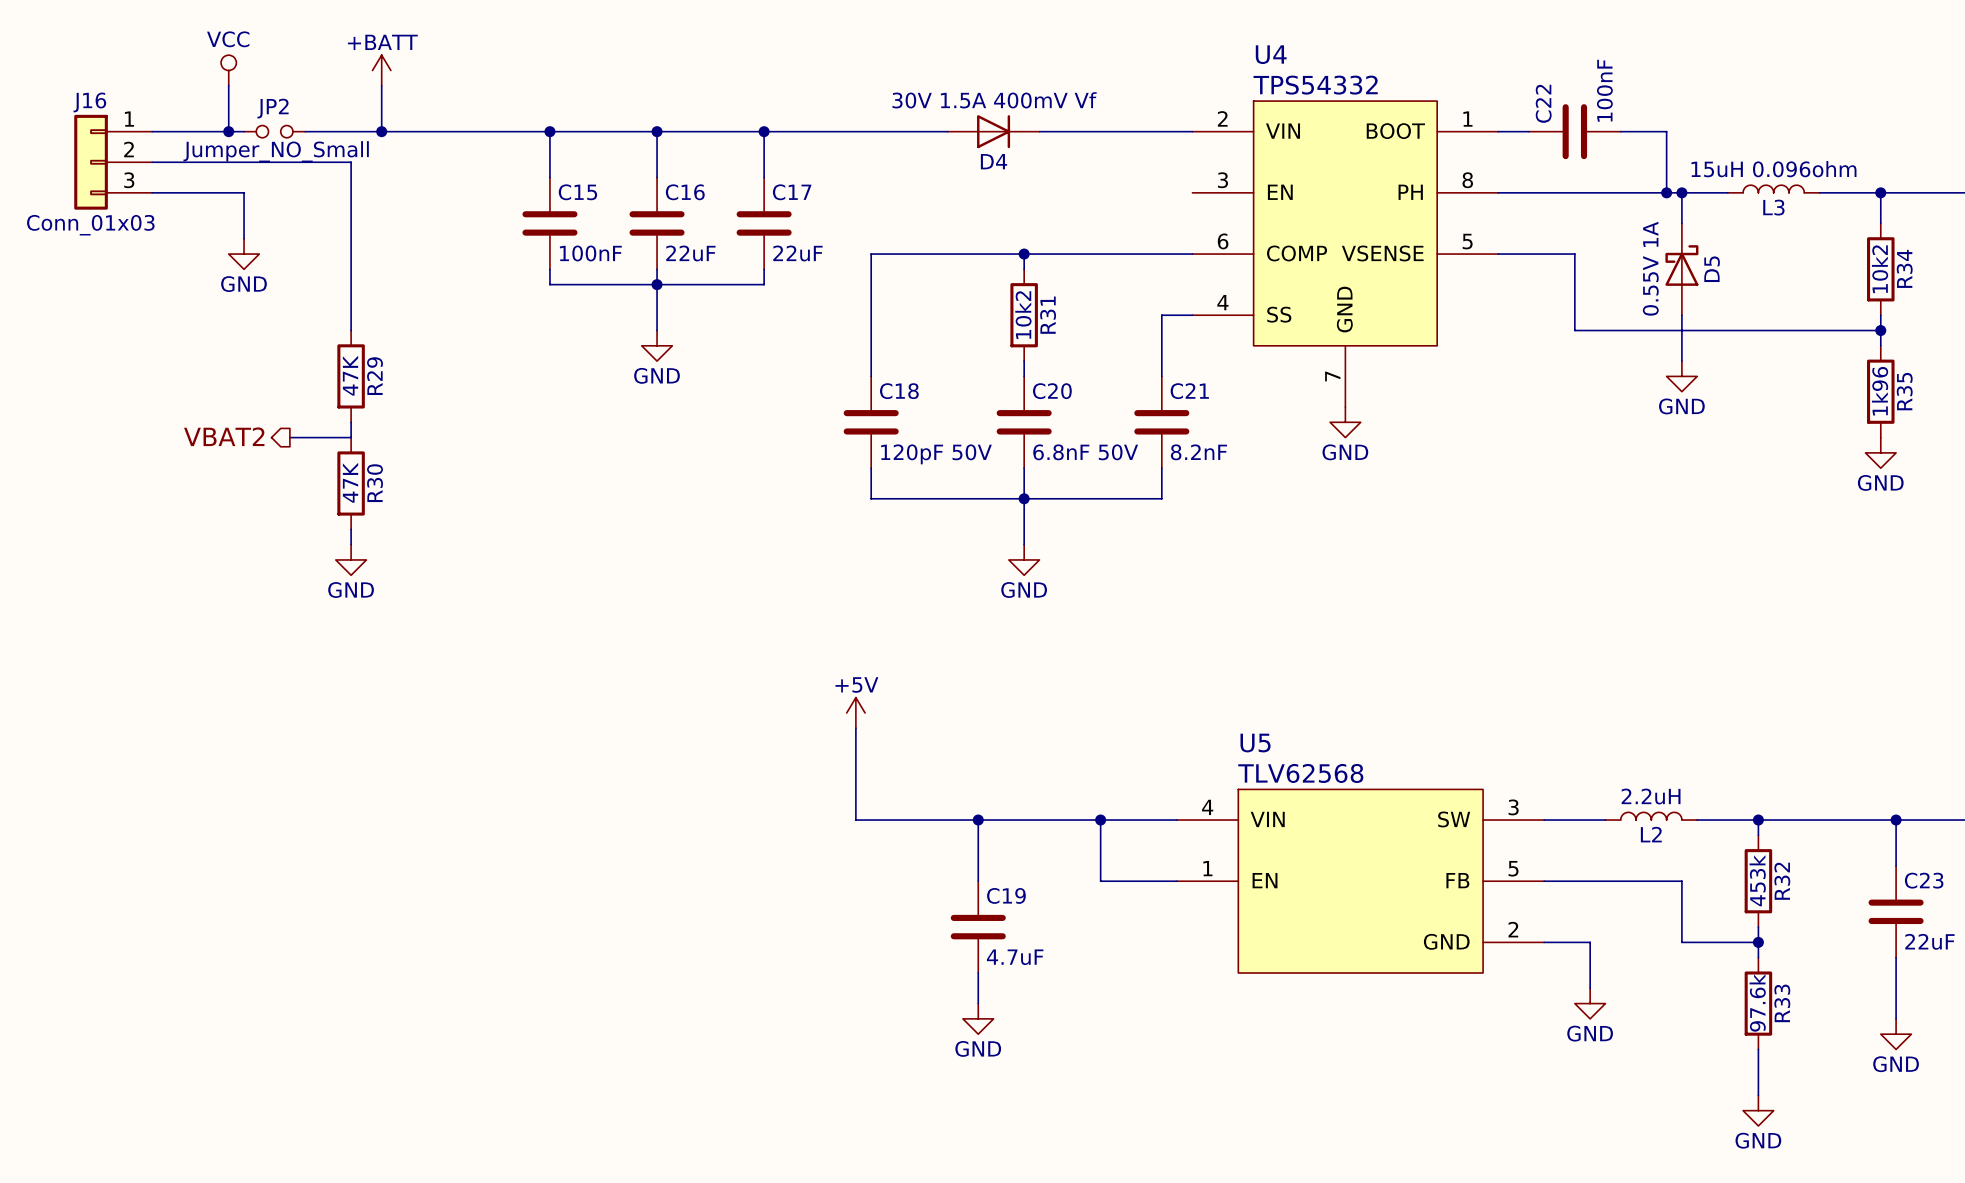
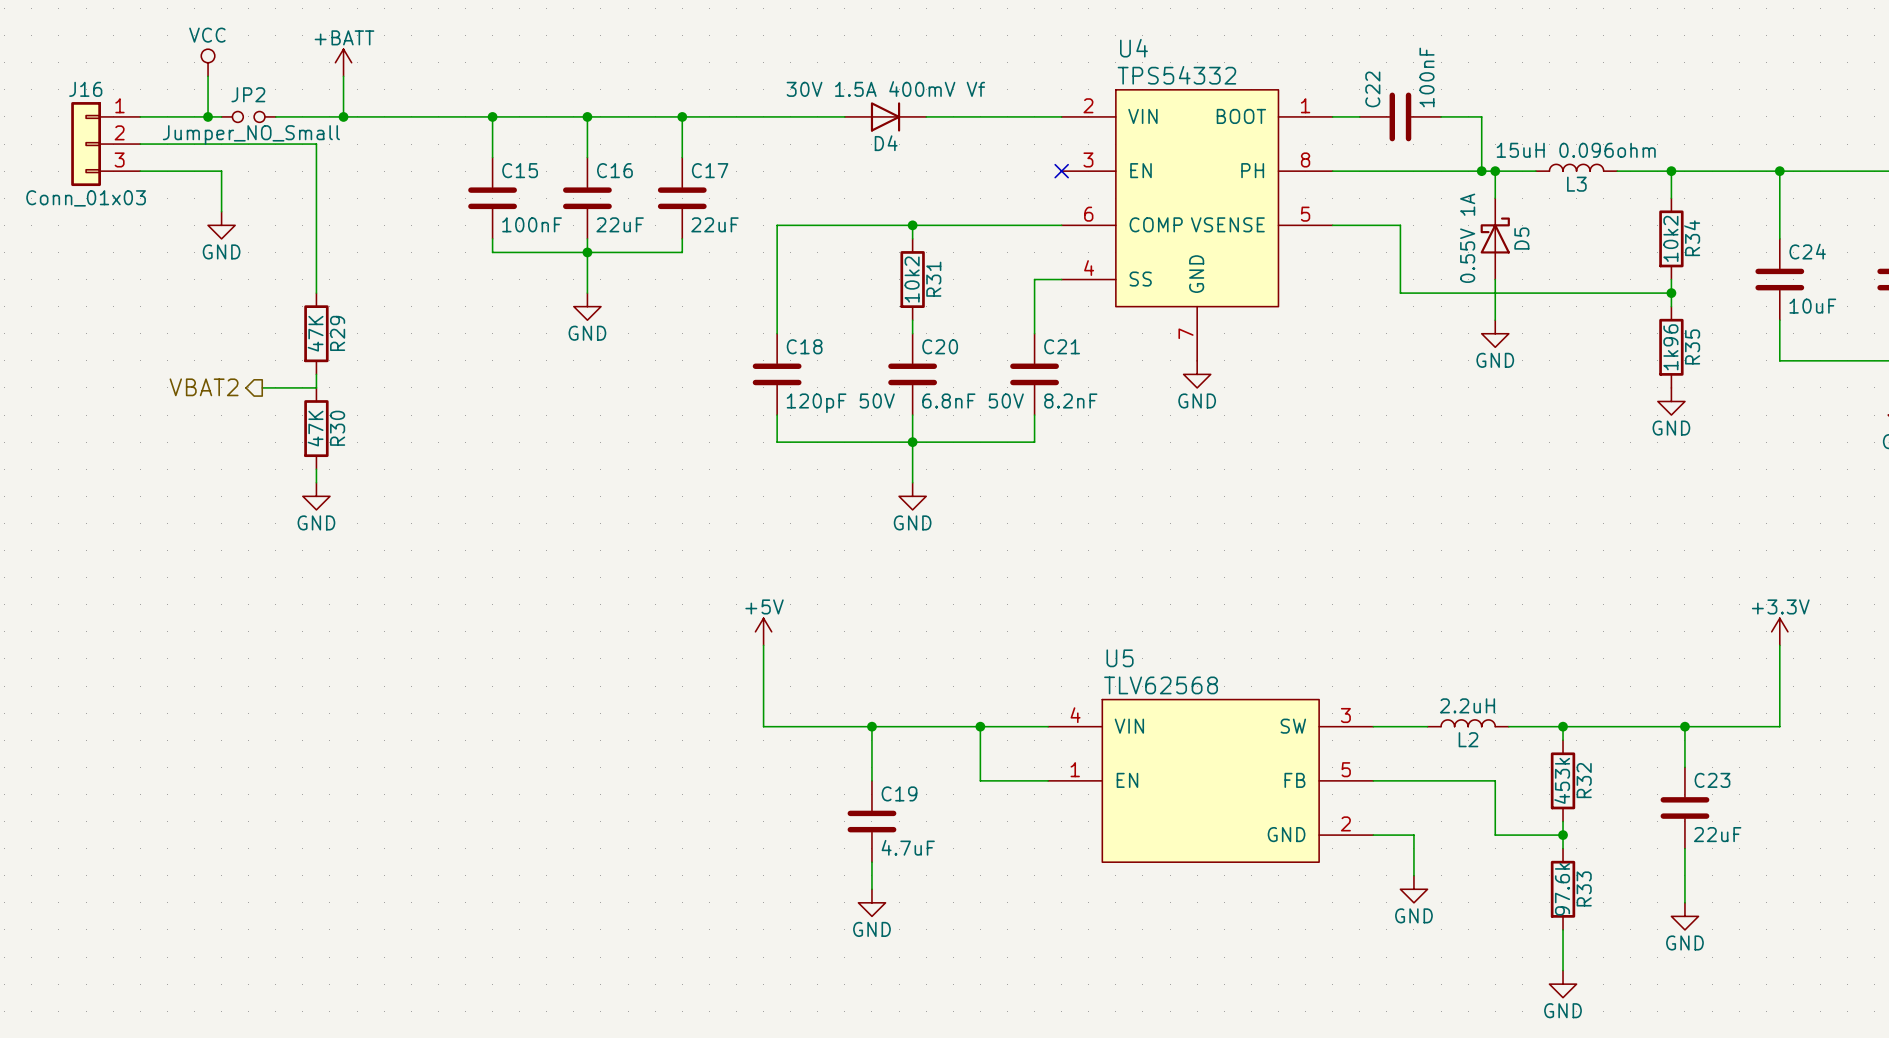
no-connect mark: none -> (1061, 171)

